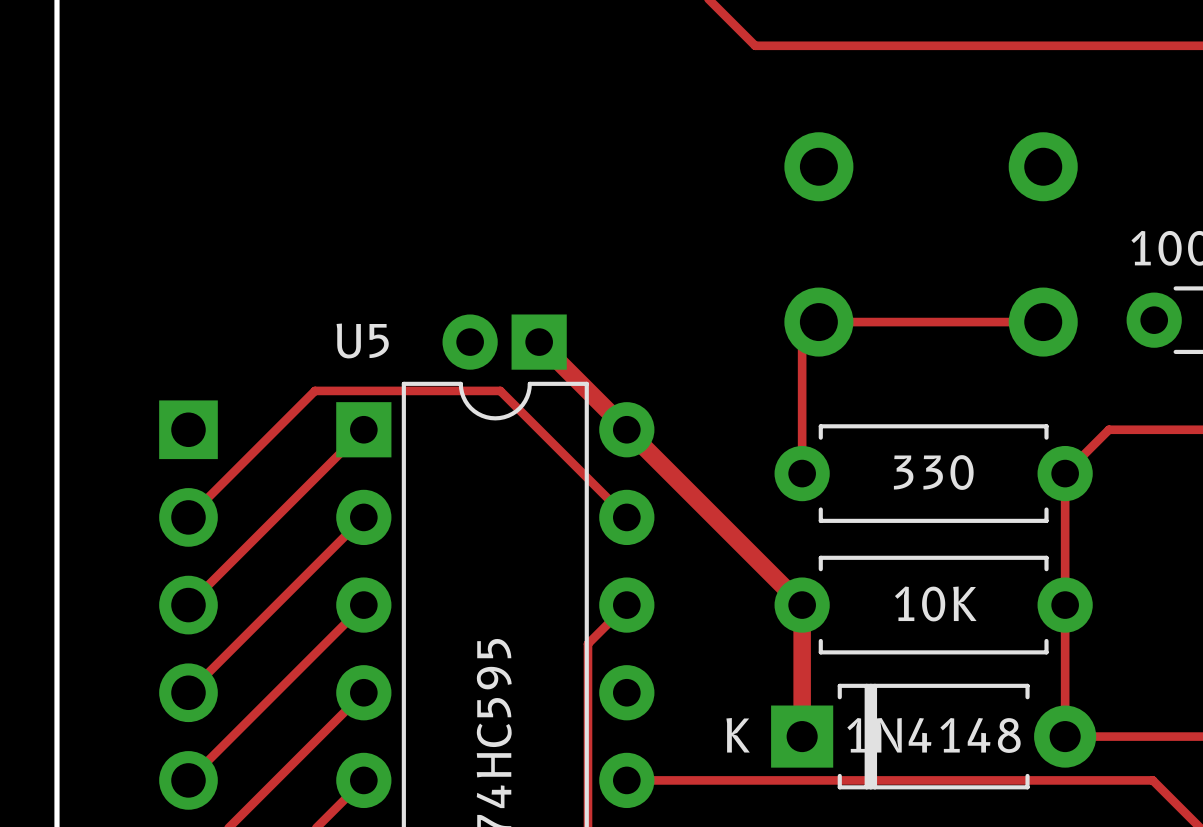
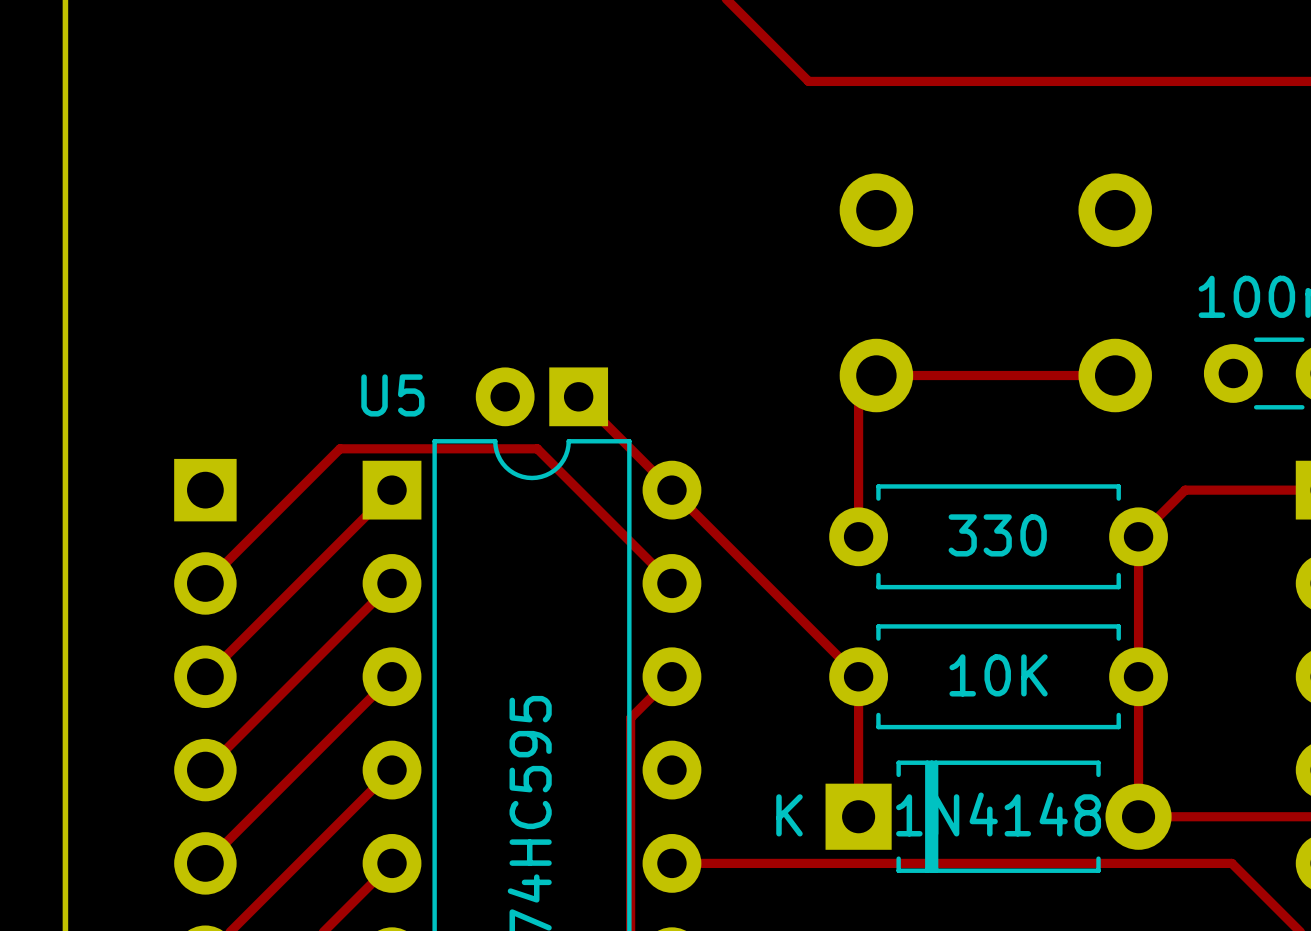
track width: thick (539, 342) (802, 605) (802, 736) -> thin (578, 396) (858, 676) (858, 816)

